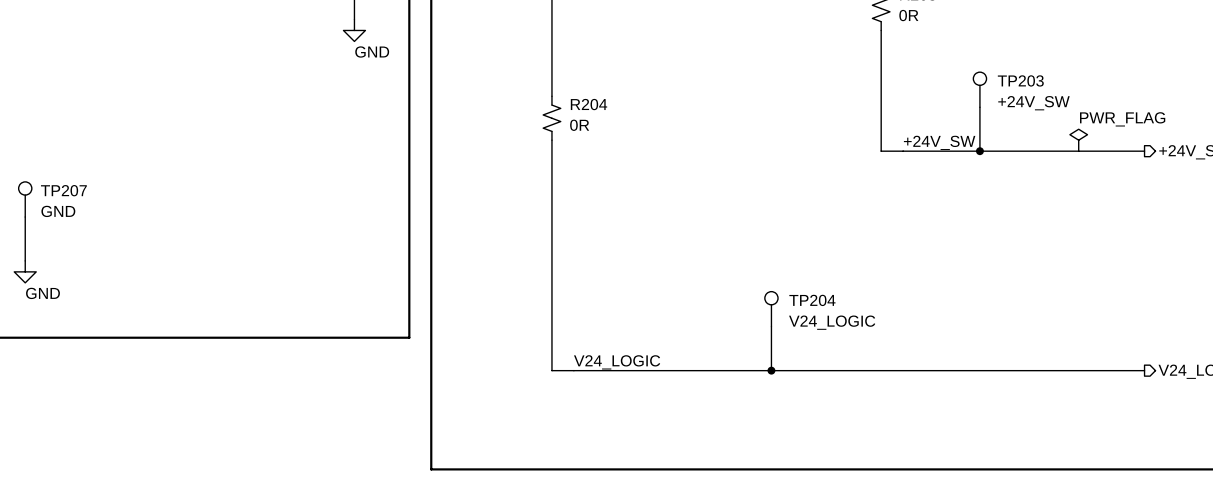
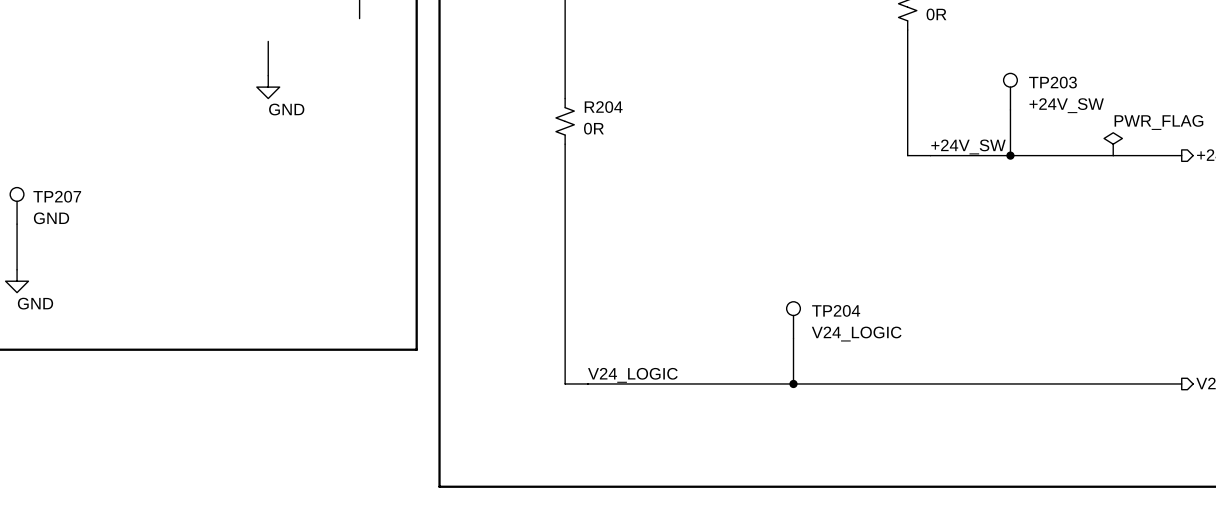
power symbol: GND (354, 30) -> none
wire: none -> (268, 41) (268, 75)
power symbol: none -> GND (268, 87)

